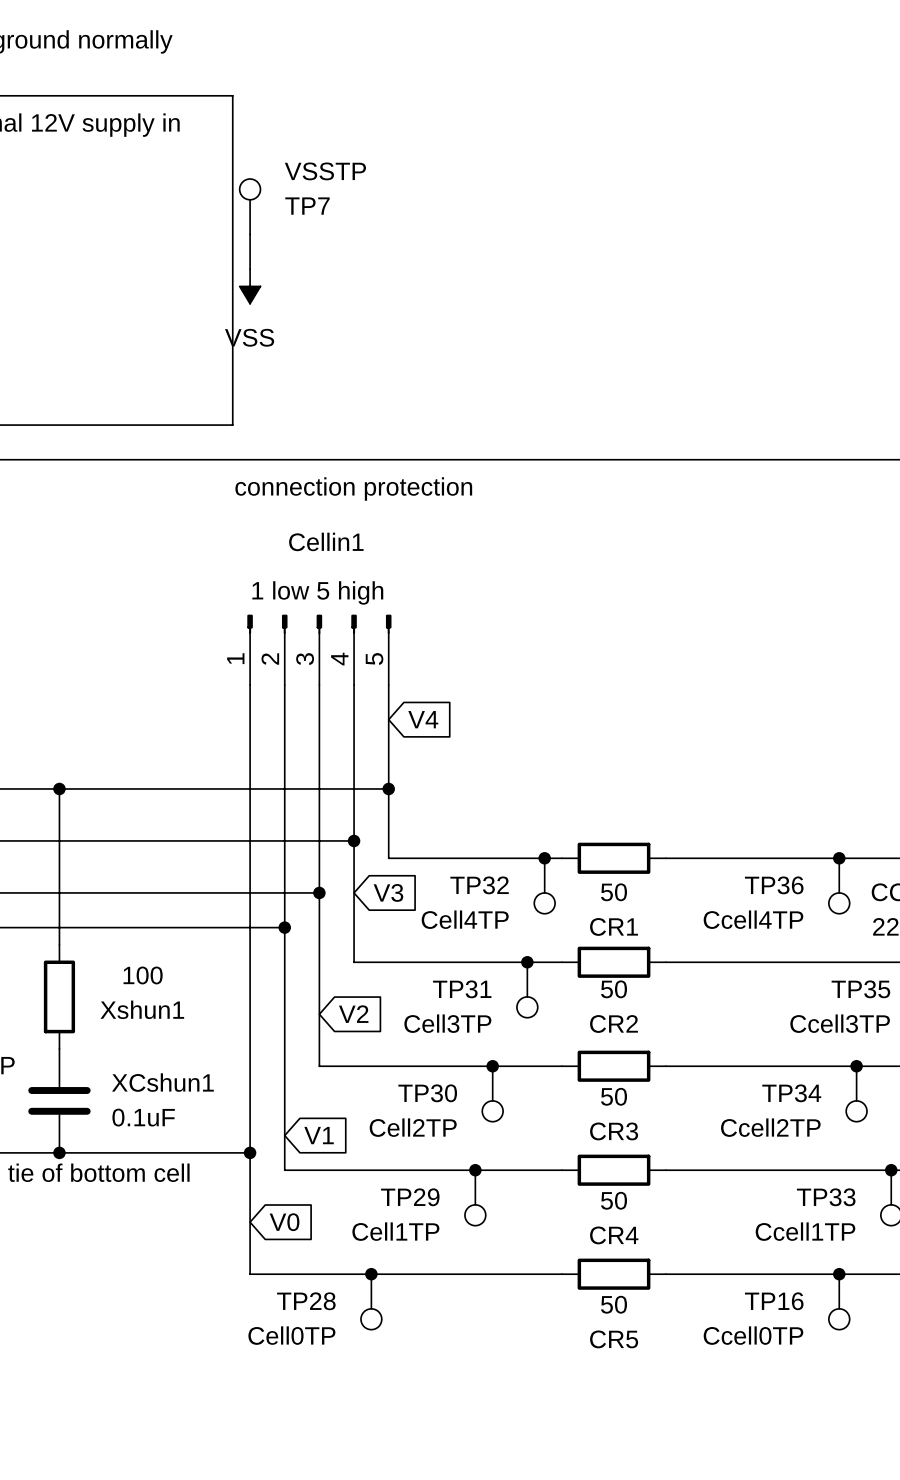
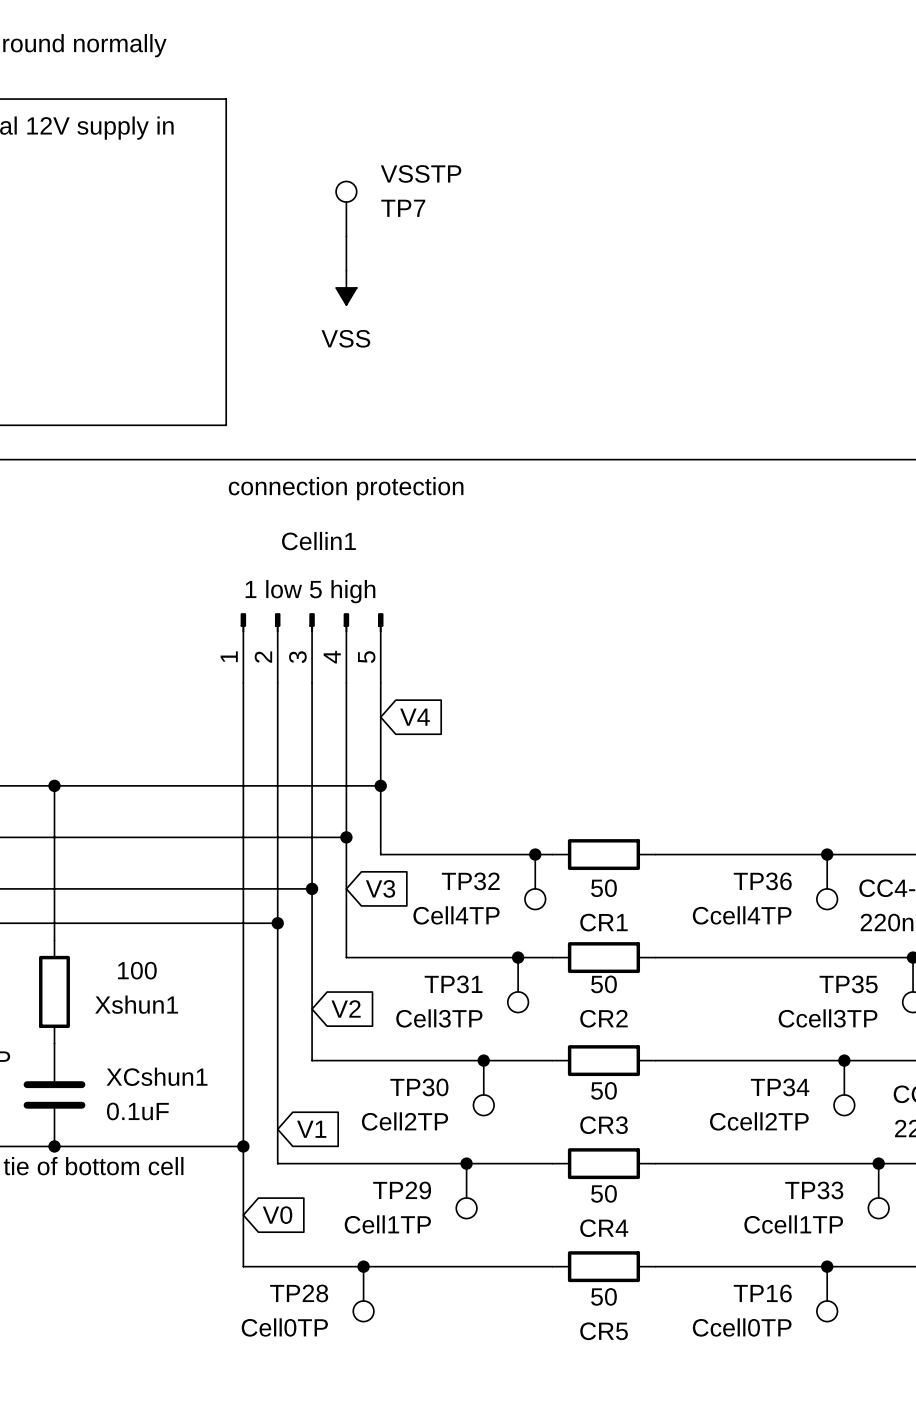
TP7 position: (250, 206) -> (346, 208)
wire: (250, 234) (250, 269) -> (346, 236) (346, 270)
power symbol position: VSS (250, 286) -> VSS (346, 287)

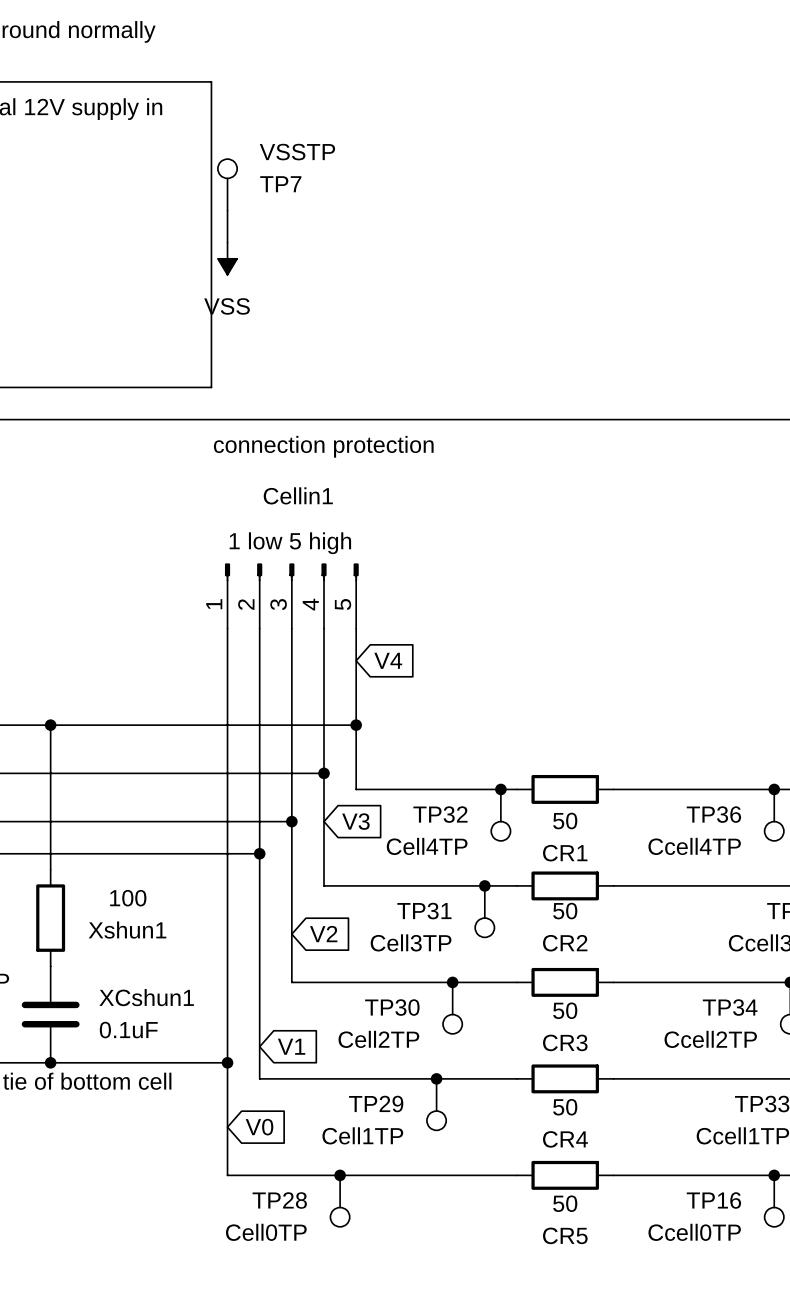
TP7 position: (346, 208) -> (227, 184)
wire: (346, 236) (346, 270) -> (227, 210) (227, 242)
power symbol position: VSS (346, 287) -> VSS (227, 258)

